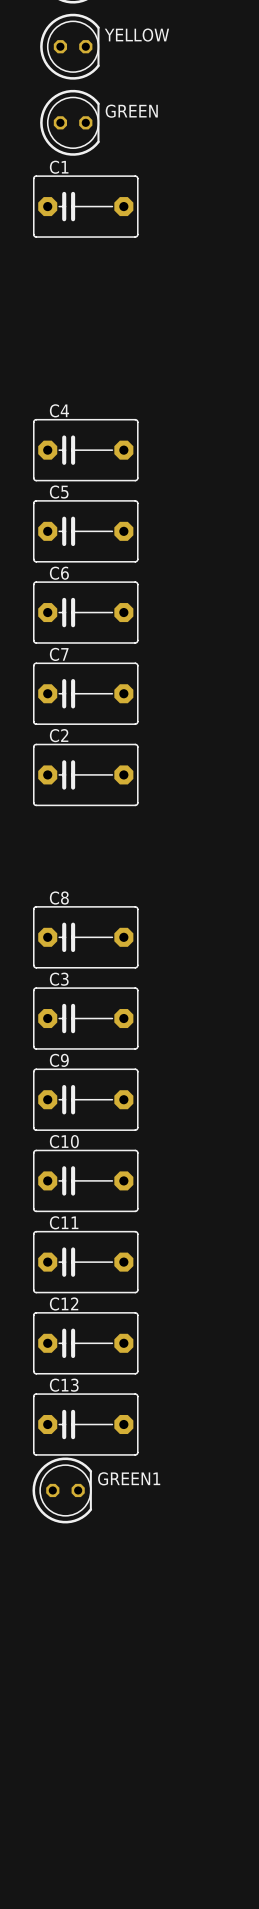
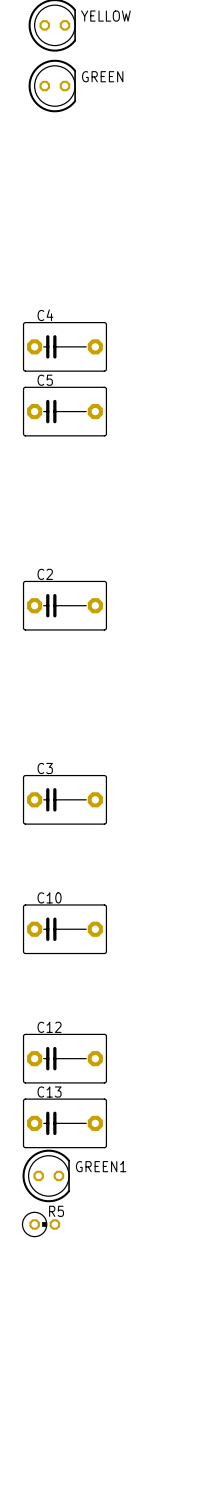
C1: (85, 206) -> none
C6: (85, 612) -> none
C7: (85, 693) -> none
C8: (85, 937) -> none
C9: (85, 1099) -> none
C11: (85, 1262) -> none
R5: none -> (41, 1224)

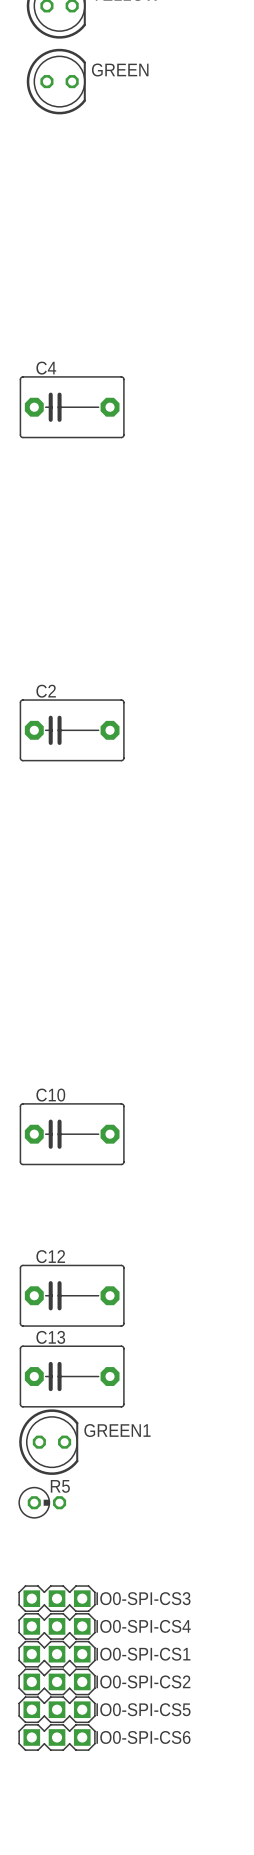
C5: (64, 411) -> none
C3: (64, 799) -> none
IO0-SPI-CS3: none -> (57, 1598)
IO0-SPI-CS4: none -> (57, 1626)
IO0-SPI-CS1: none -> (57, 1654)
IO0-SPI-CS2: none -> (57, 1681)
IO0-SPI-CS5: none -> (57, 1709)
IO0-SPI-CS6: none -> (57, 1737)

